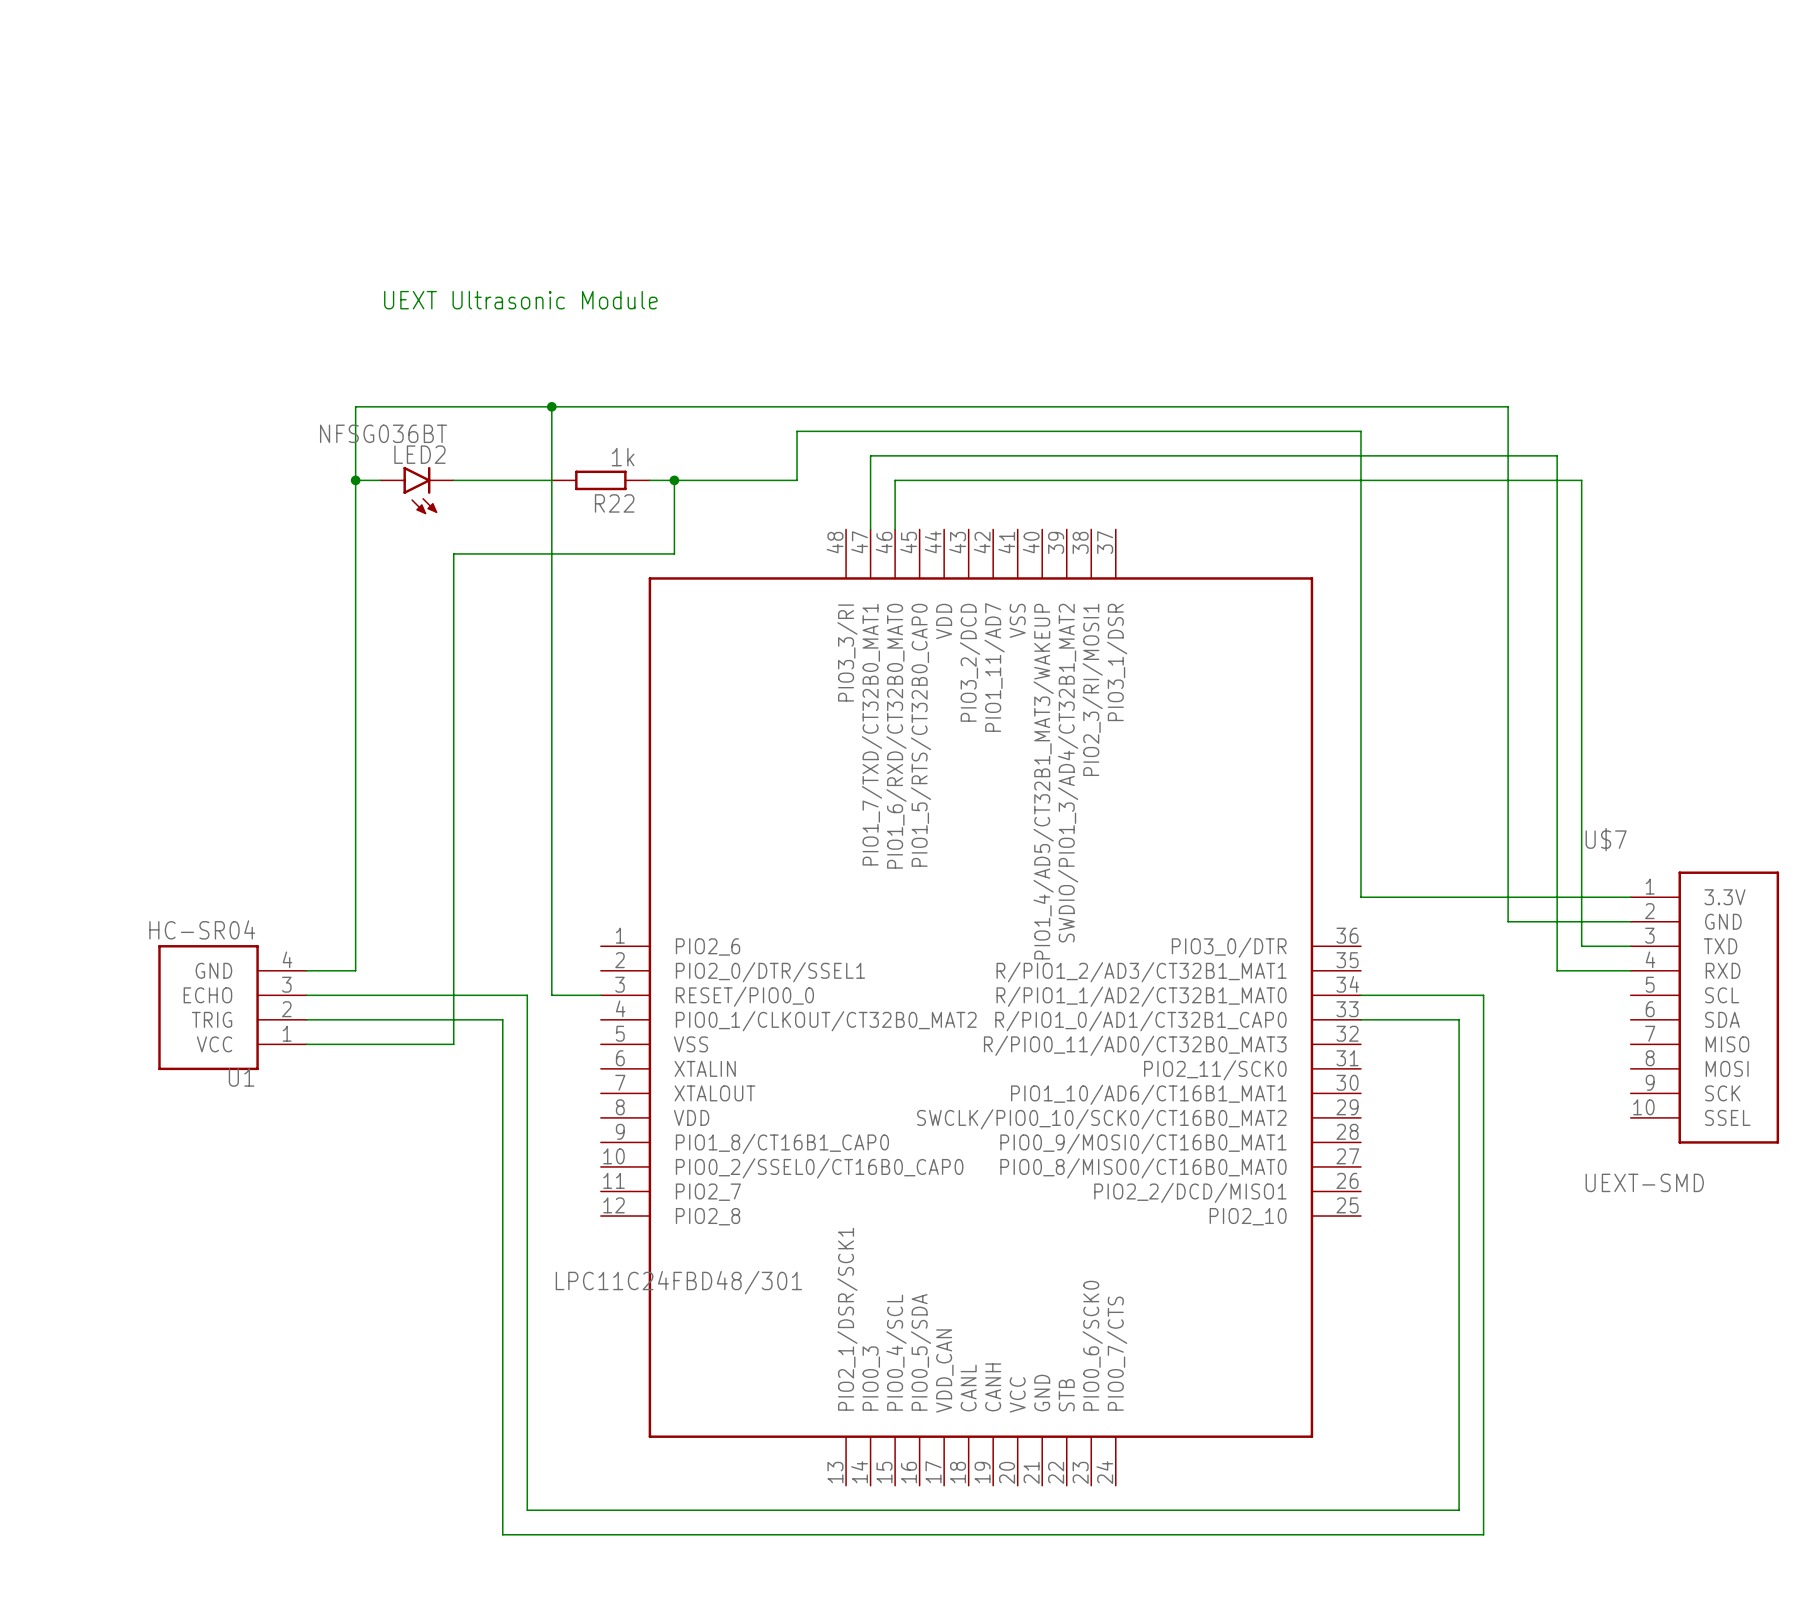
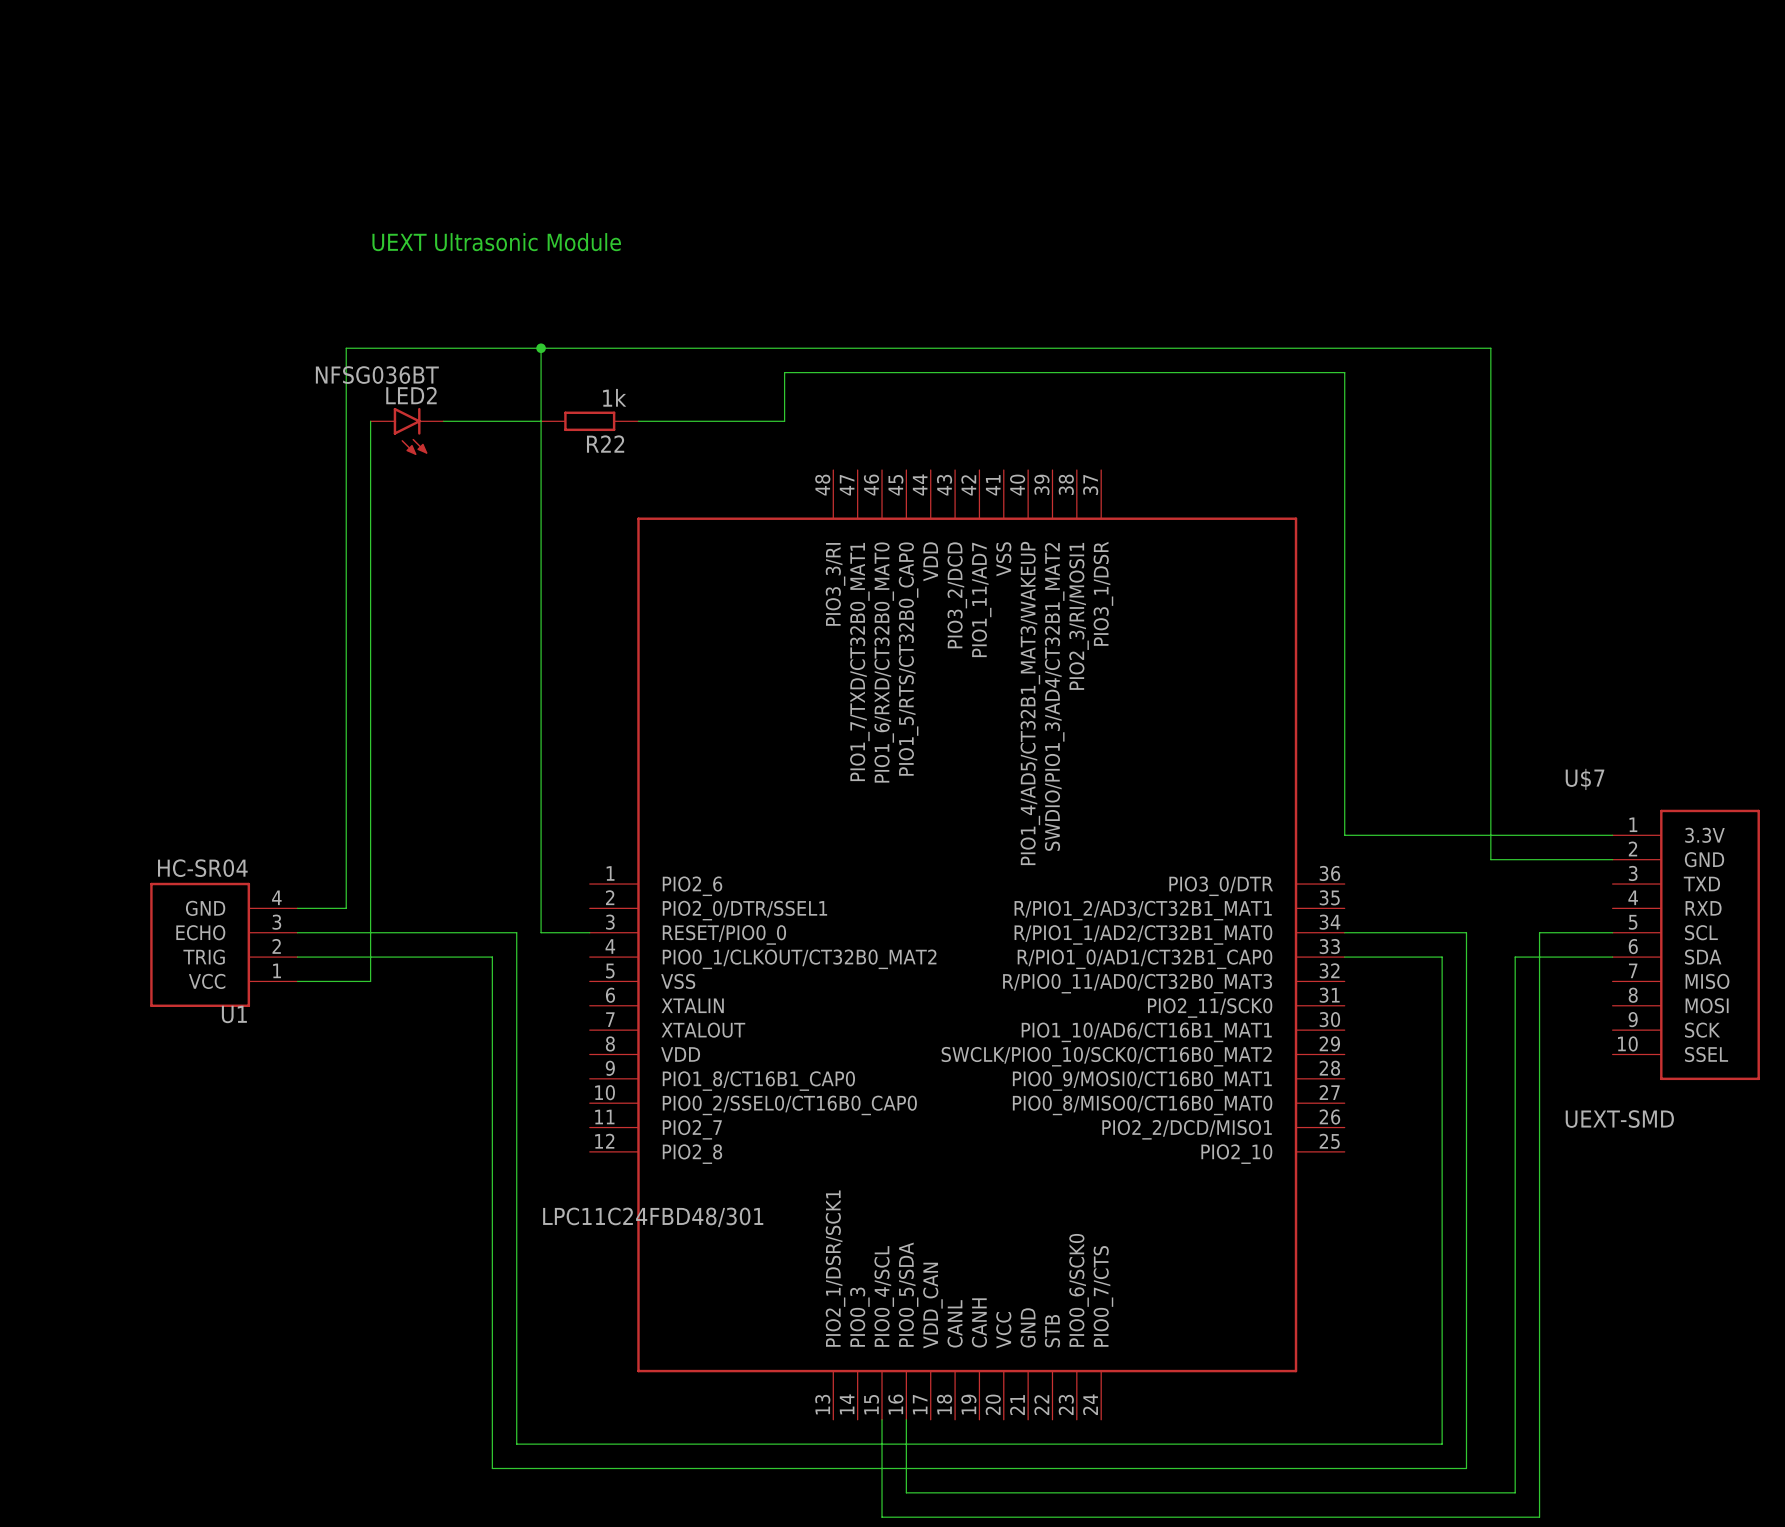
wire: (355, 480) (380, 480) -> none
junction: (355, 480) -> none
wire: (674, 480) (674, 553) (453, 553) (453, 1044) (380, 1044) -> (370, 421) (370, 981)
junction: (674, 480) -> none
wire: (870, 529) (870, 455) (1557, 455) (1557, 970) (1630, 970) -> none
wire: (895, 529) (895, 480) (1581, 480) (1581, 946) (1630, 946) -> none
wire: none -> (1612, 932) (1539, 932) (1539, 1517) (882, 1517) (882, 1419)
wire: none -> (1612, 957) (1515, 957) (1515, 1492) (906, 1492) (906, 1419)

